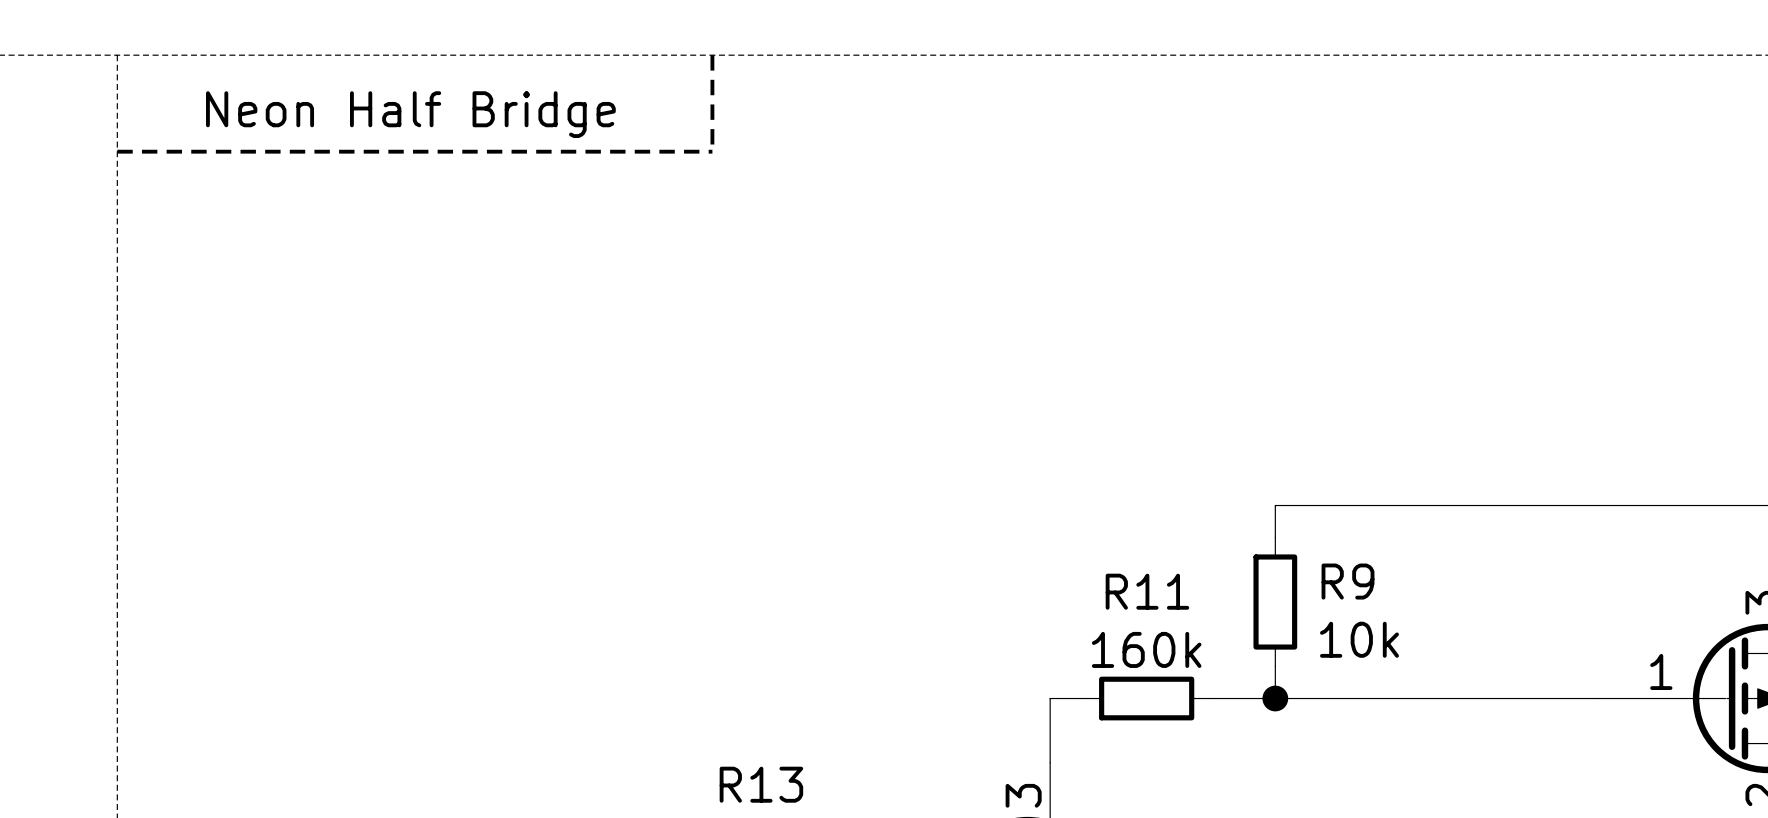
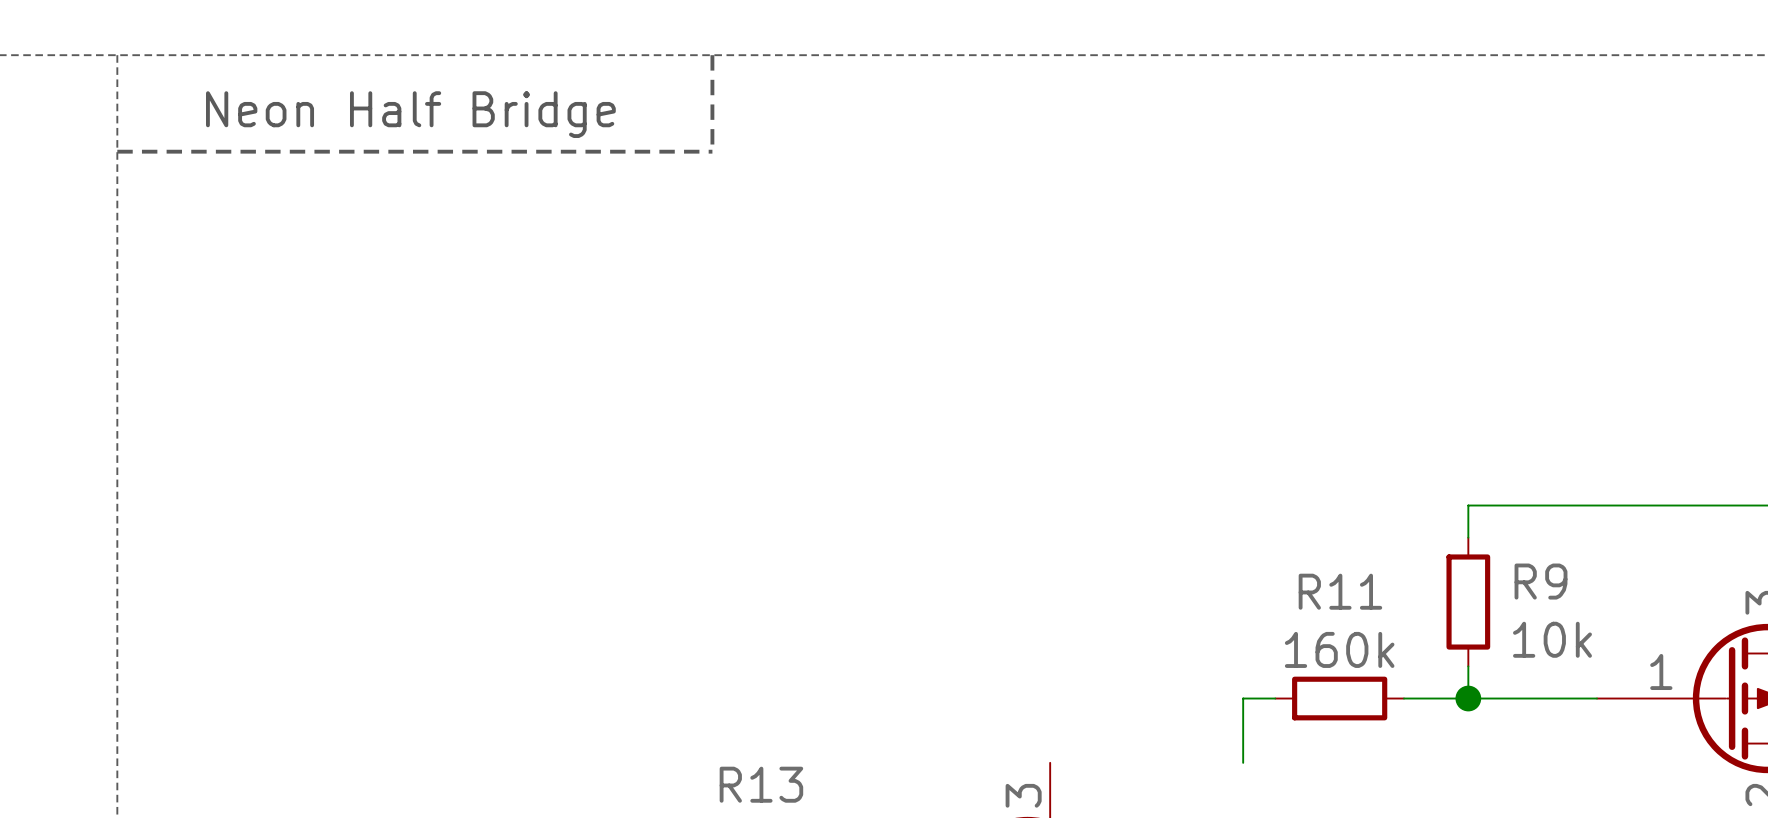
wire: (1468, 505) (1275, 505) (1275, 537) -> (1468, 505) (1468, 537)
R9 position: (1275, 602) -> (1468, 602)
wire: (1275, 666) (1275, 698) (1404, 698) -> none
wire: none -> (1468, 666) (1468, 698)
wire: (1082, 698) (1050, 698) (1050, 762) -> none
R11 position: (1146, 698) -> (1339, 698)
wire: (1211, 698) (1243, 698) -> (1243, 762) (1243, 698)
junction: (1275, 698) -> none
junction: none -> (1468, 698)

